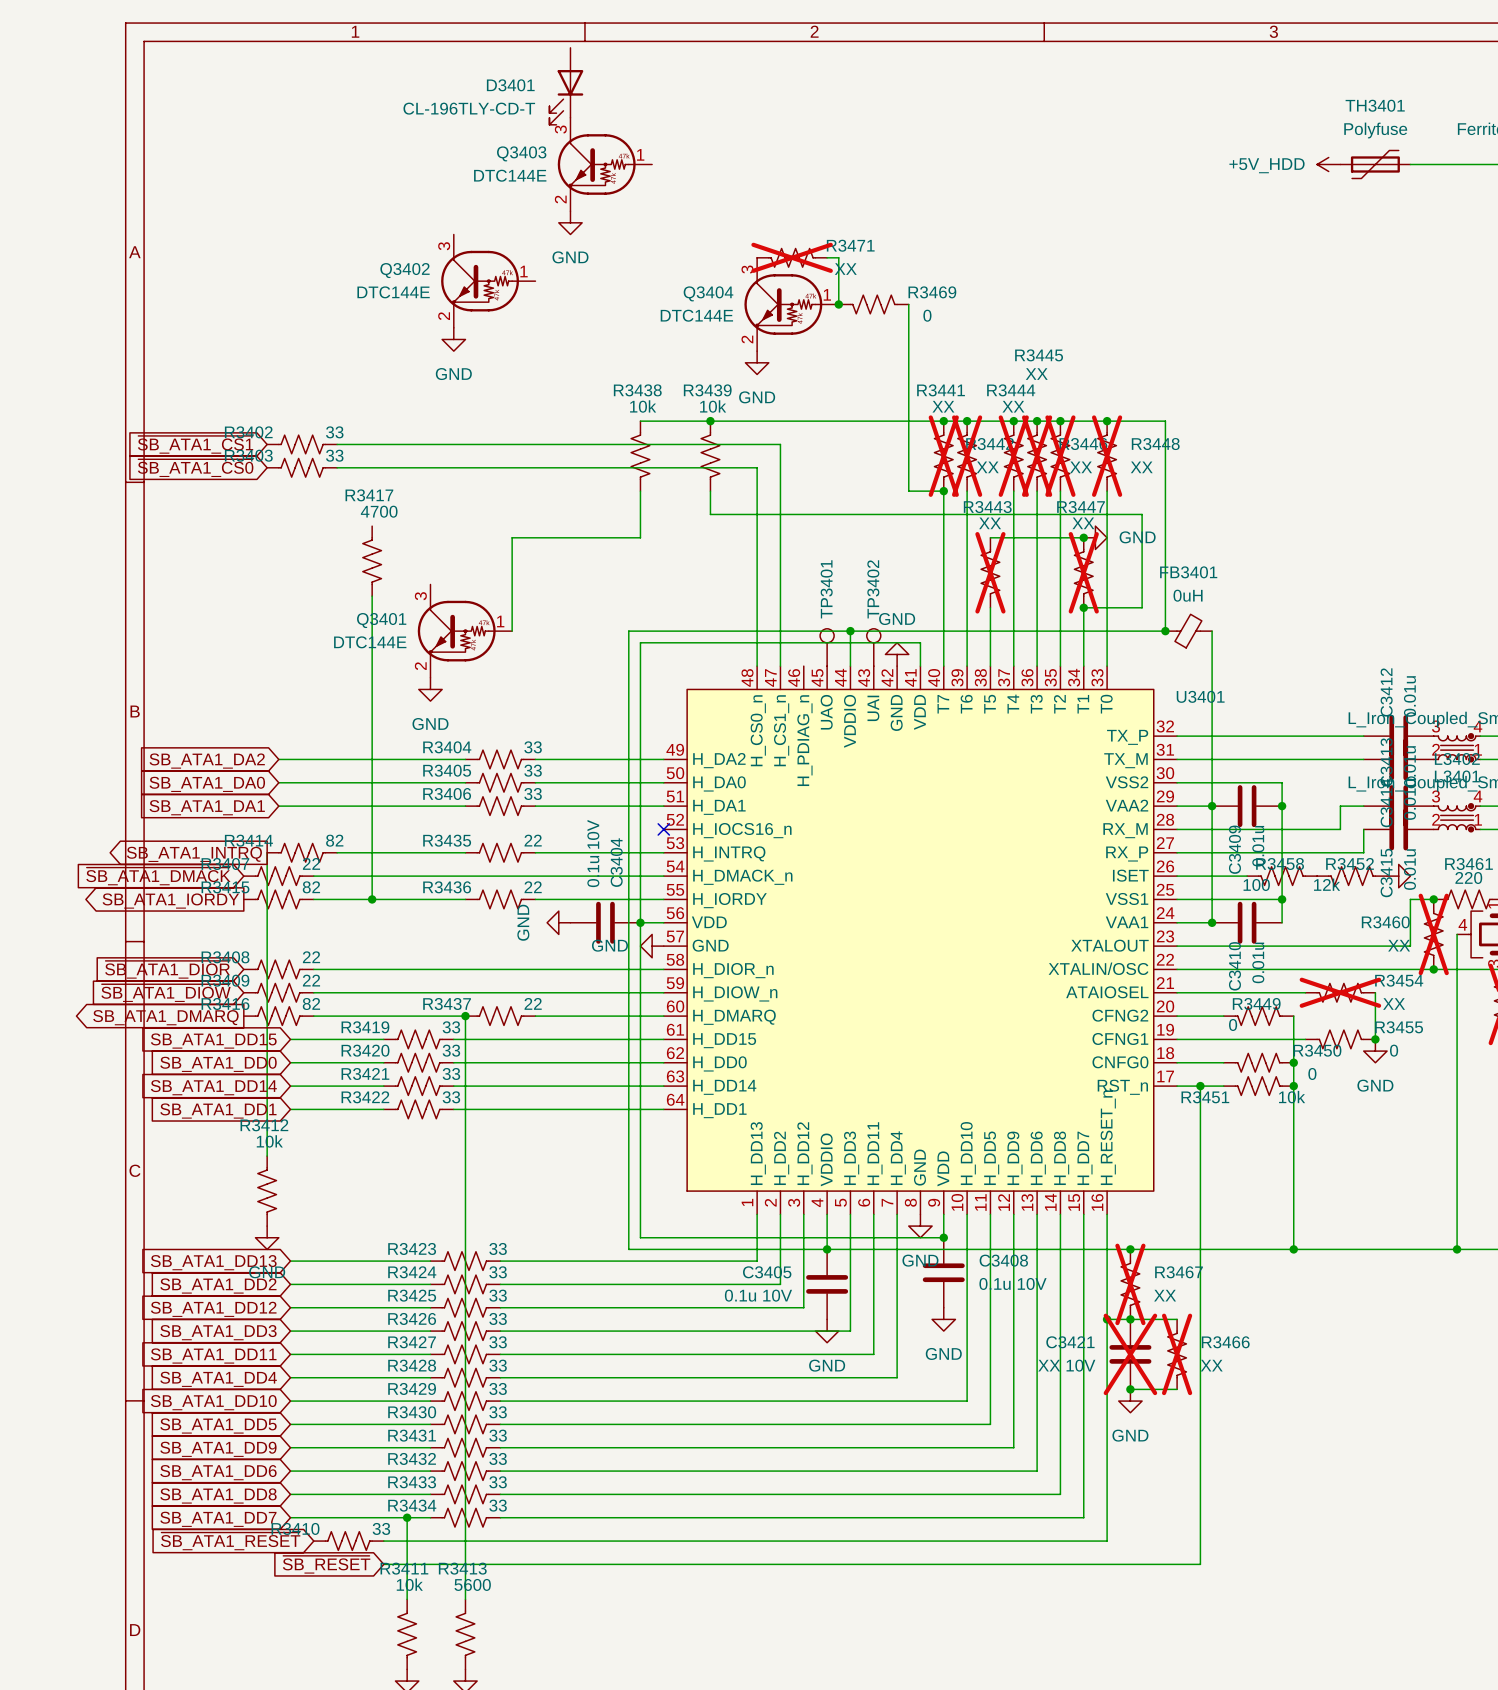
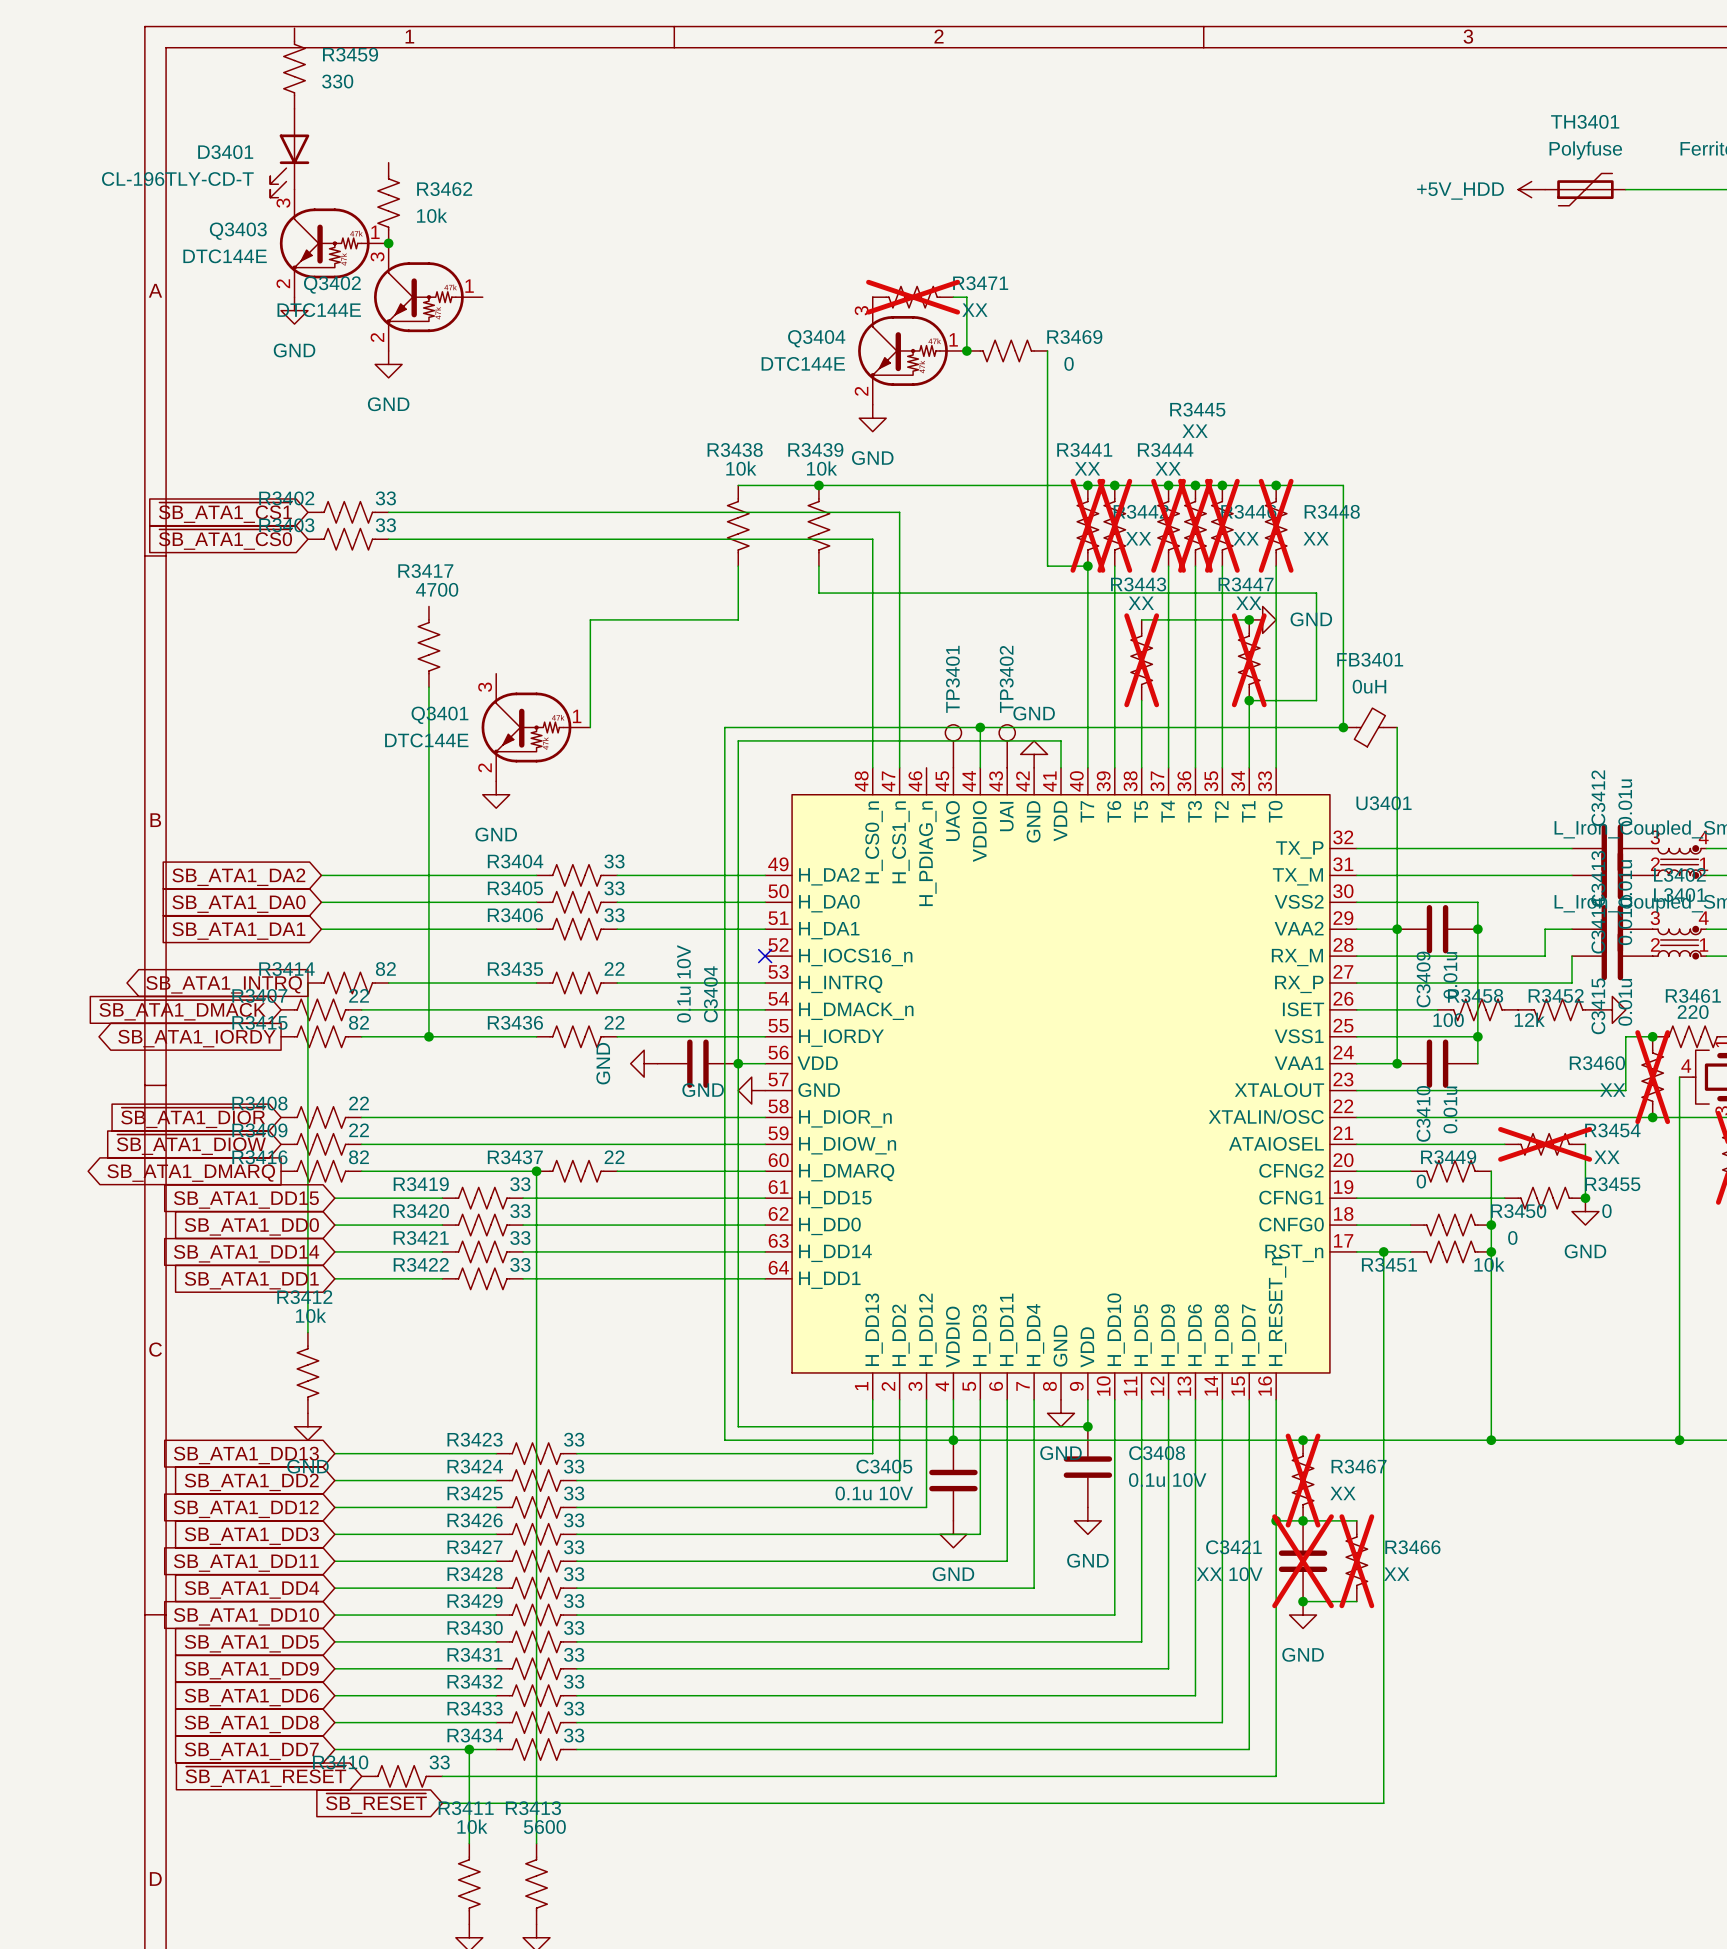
R3459: none -> 330 (294, 68)
D3401 position: (566, 86) -> (289, 153)
Q3403 position: (604, 164) -> (334, 243)
R3462: none -> 10k (388, 203)
junction: none -> (388, 243)
power symbol: GND (570, 222) -> none
power symbol: none -> GND (294, 310)
Q3402 position: (488, 281) -> (428, 297)
power symbol: none -> GND (388, 364)
power symbol: GND (453, 339) -> none

